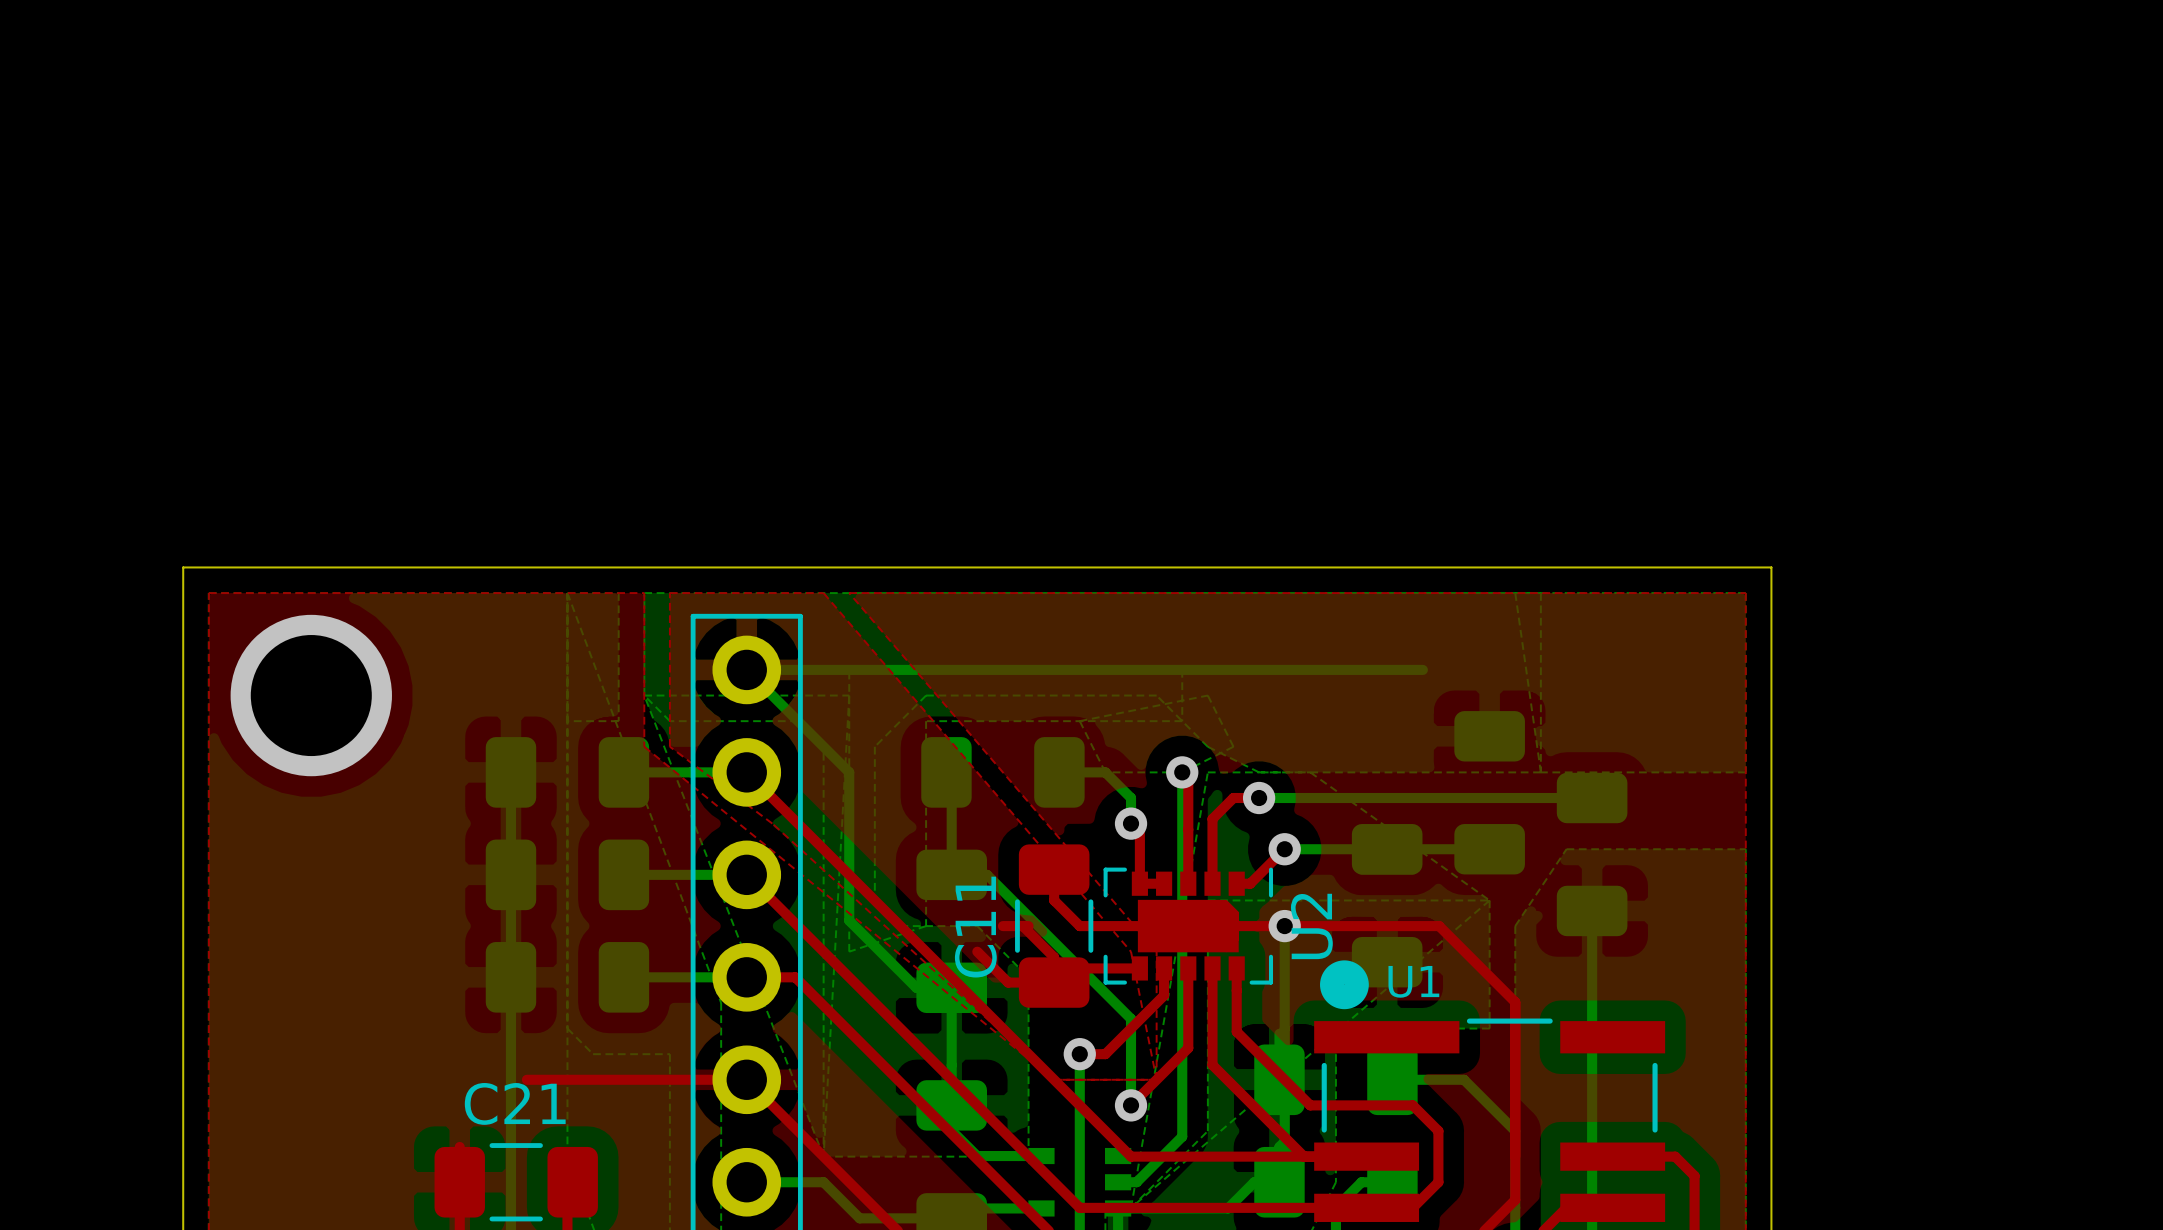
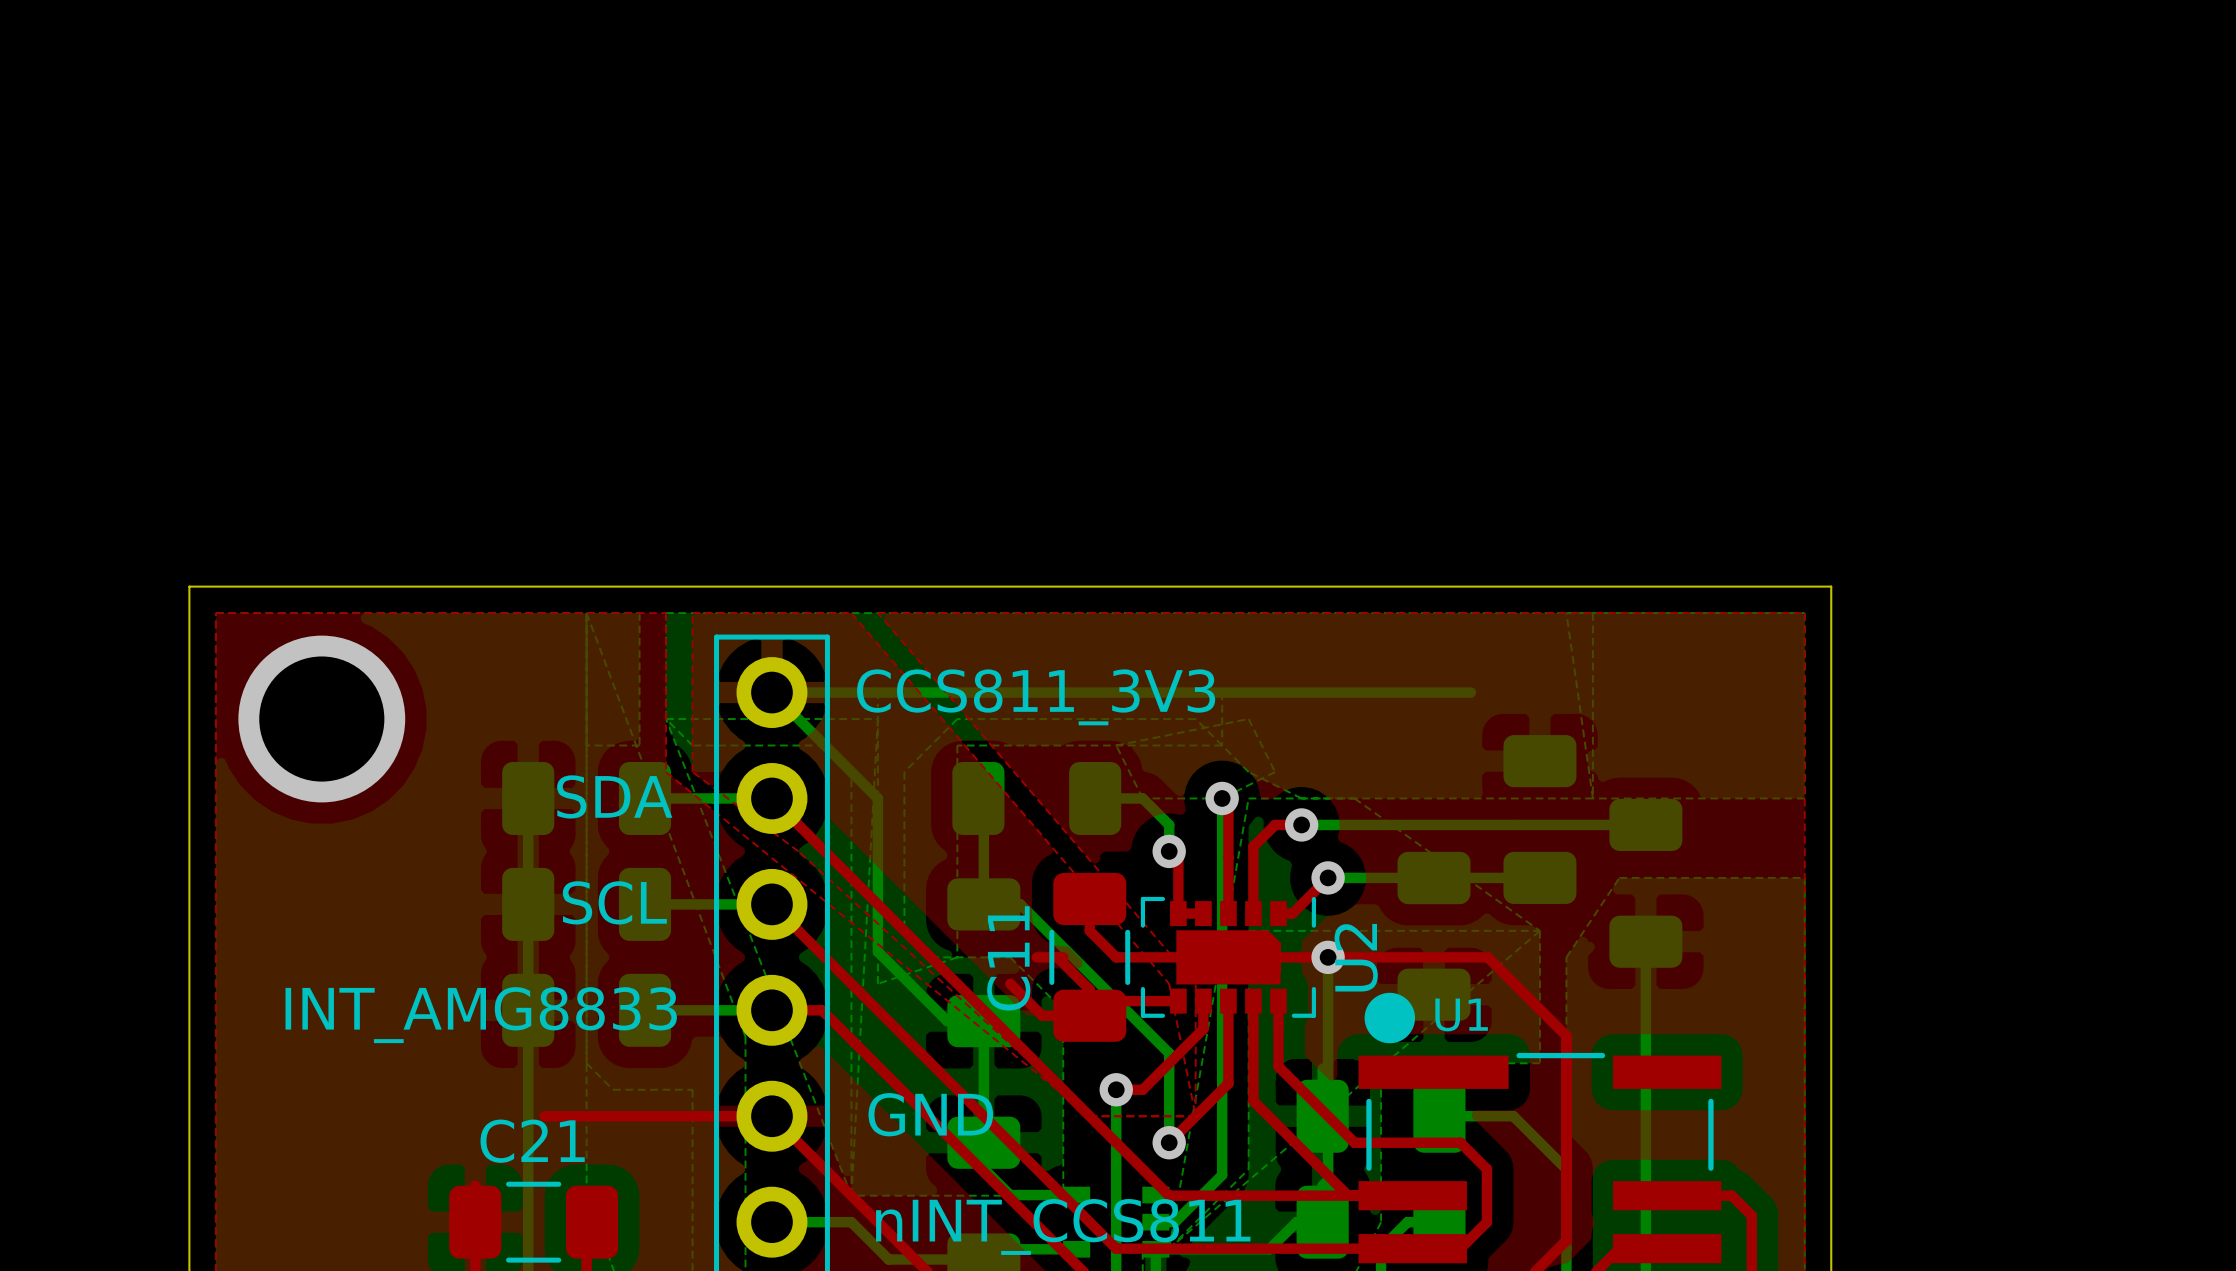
text: none -> CCS811_3V3 (1036, 697)
text: none -> SDA (614, 796)
text: none -> SCL (614, 902)
text: none -> INT_AMG8833 (481, 1015)
text: none -> GND (930, 1114)
text: none -> nINT_CCS811 (1063, 1226)

